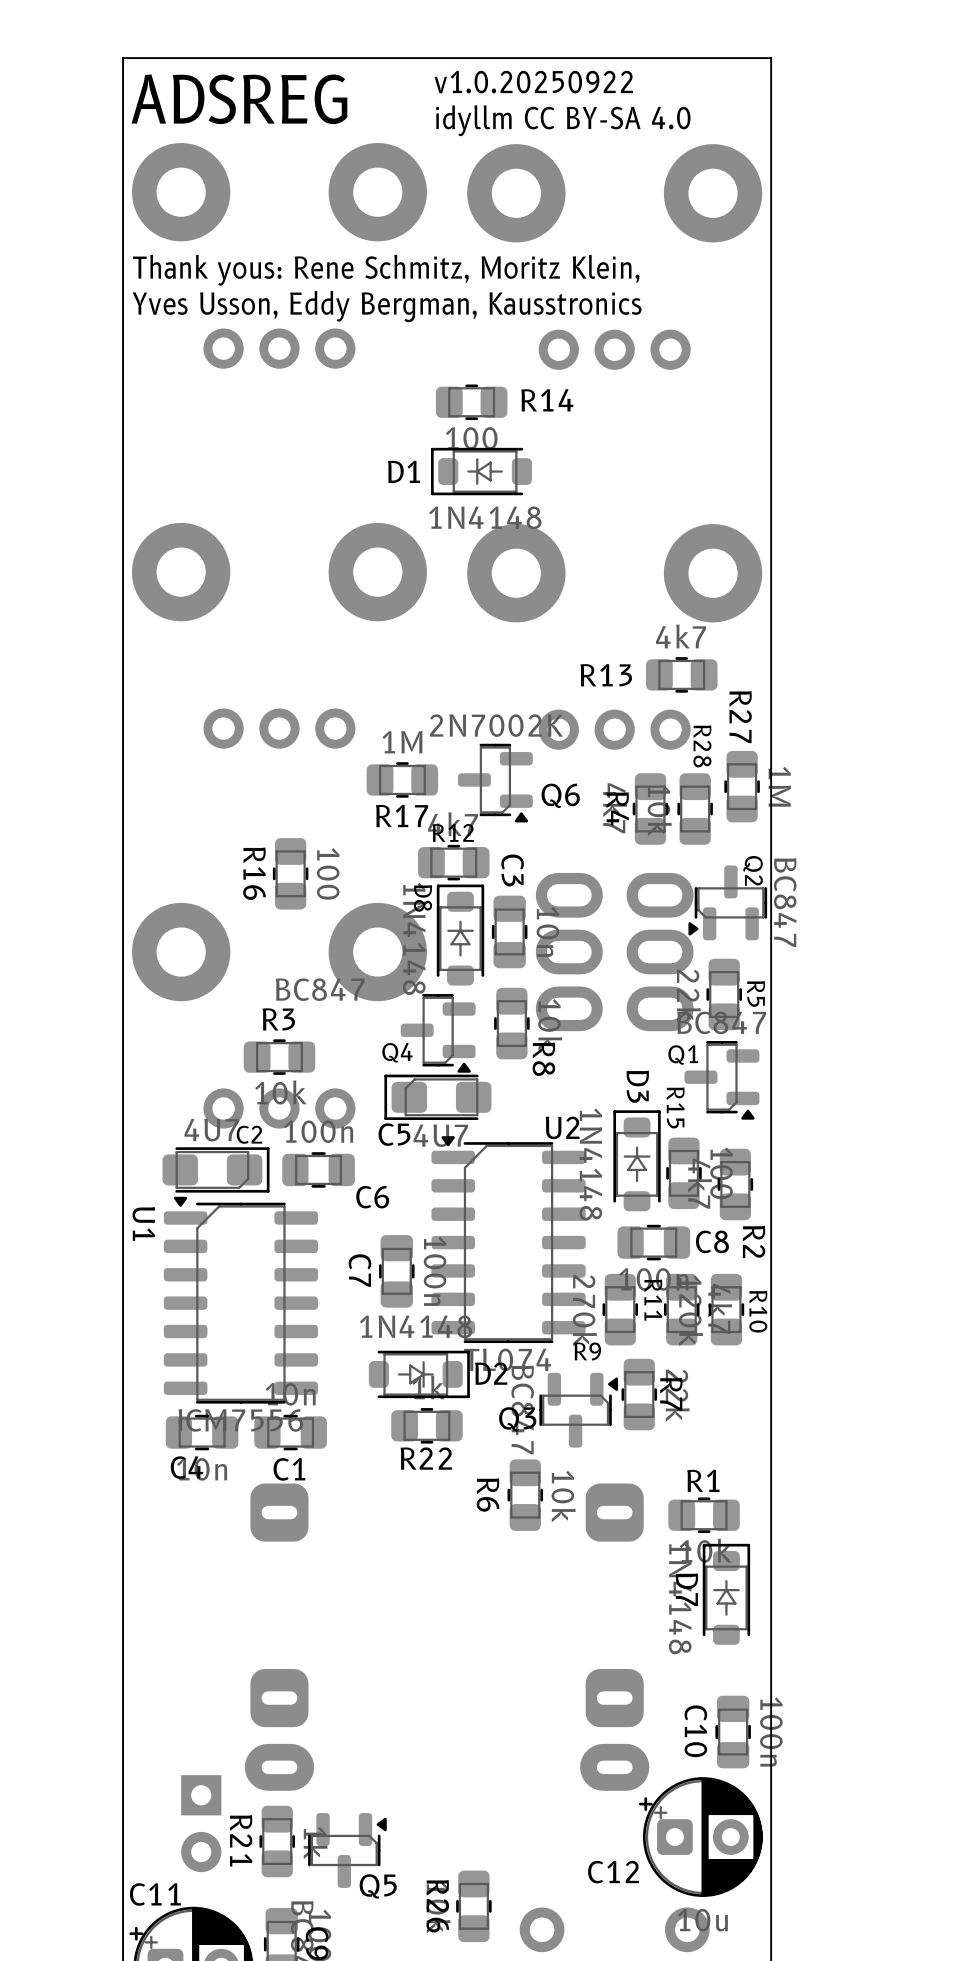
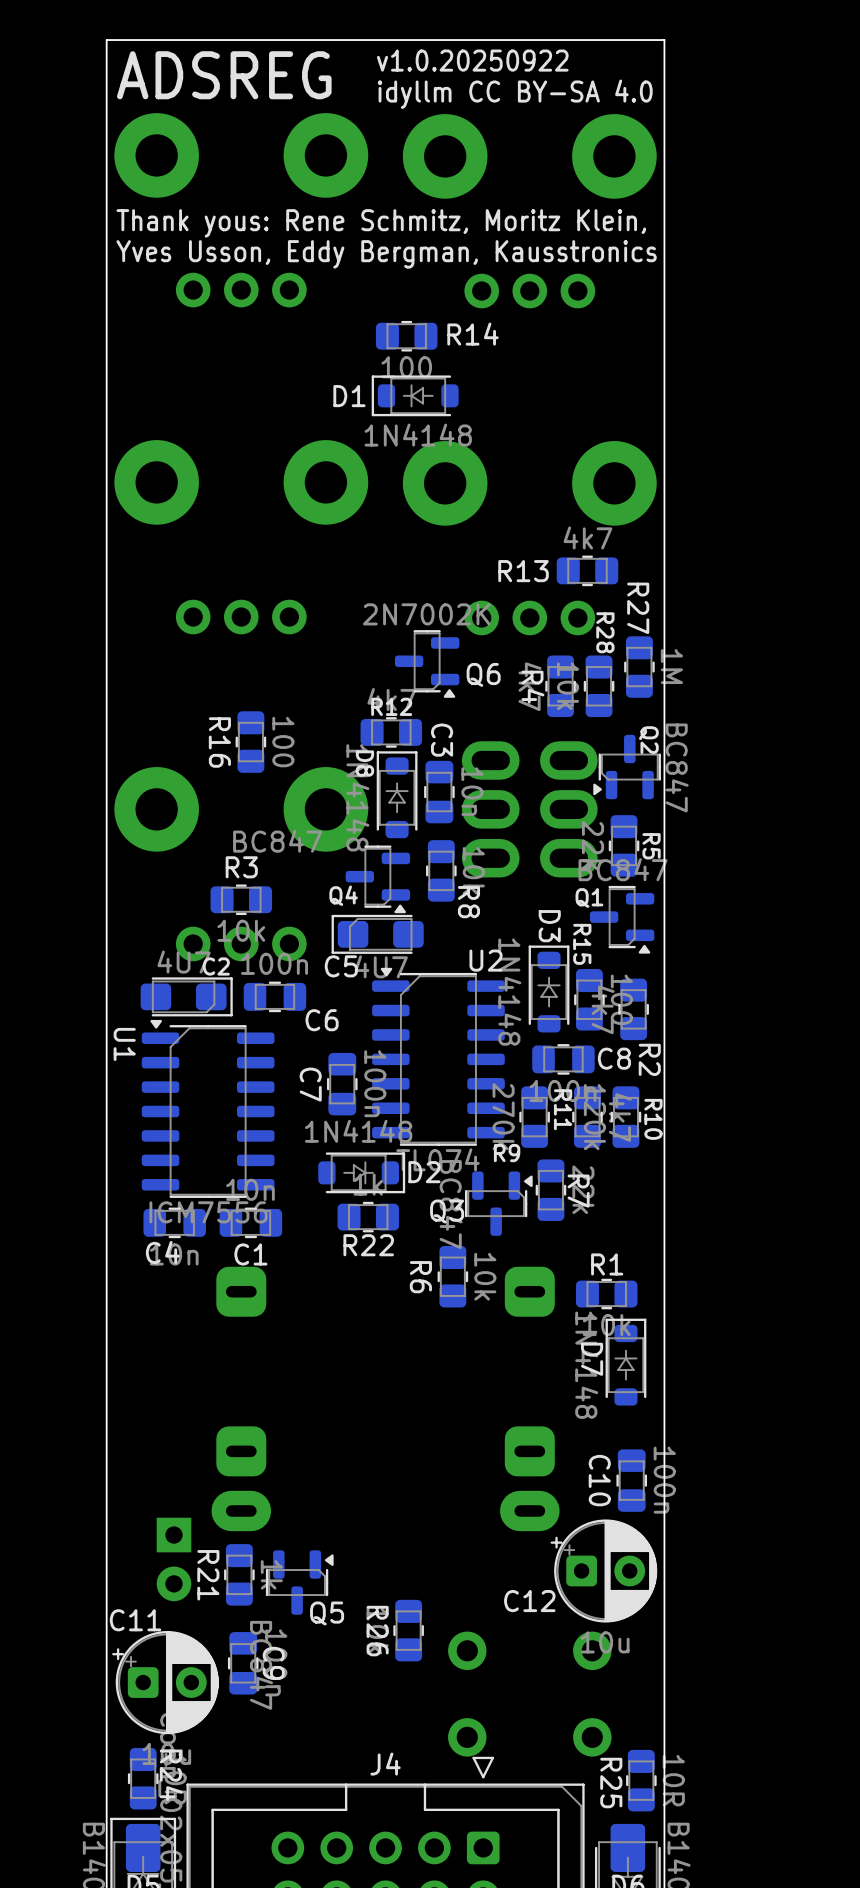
R17: 1M (402, 779) -> none

